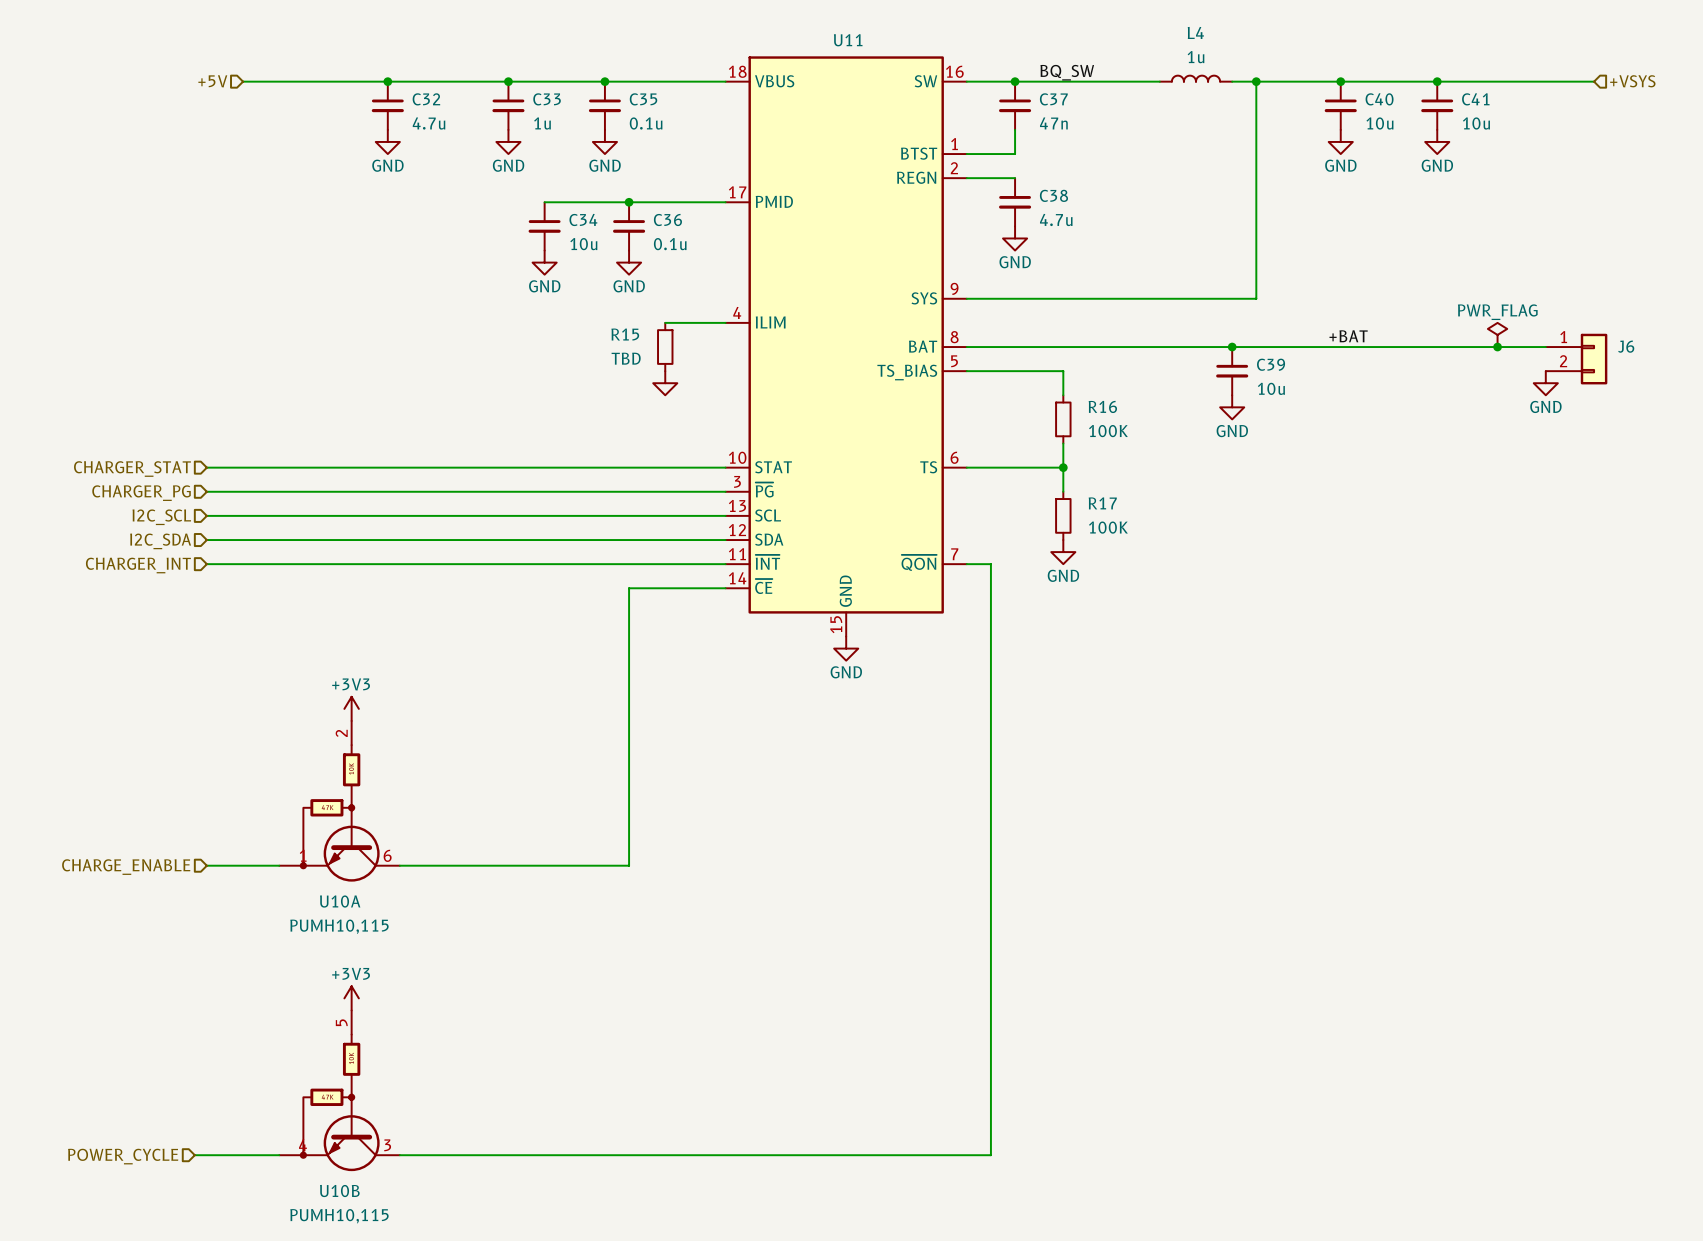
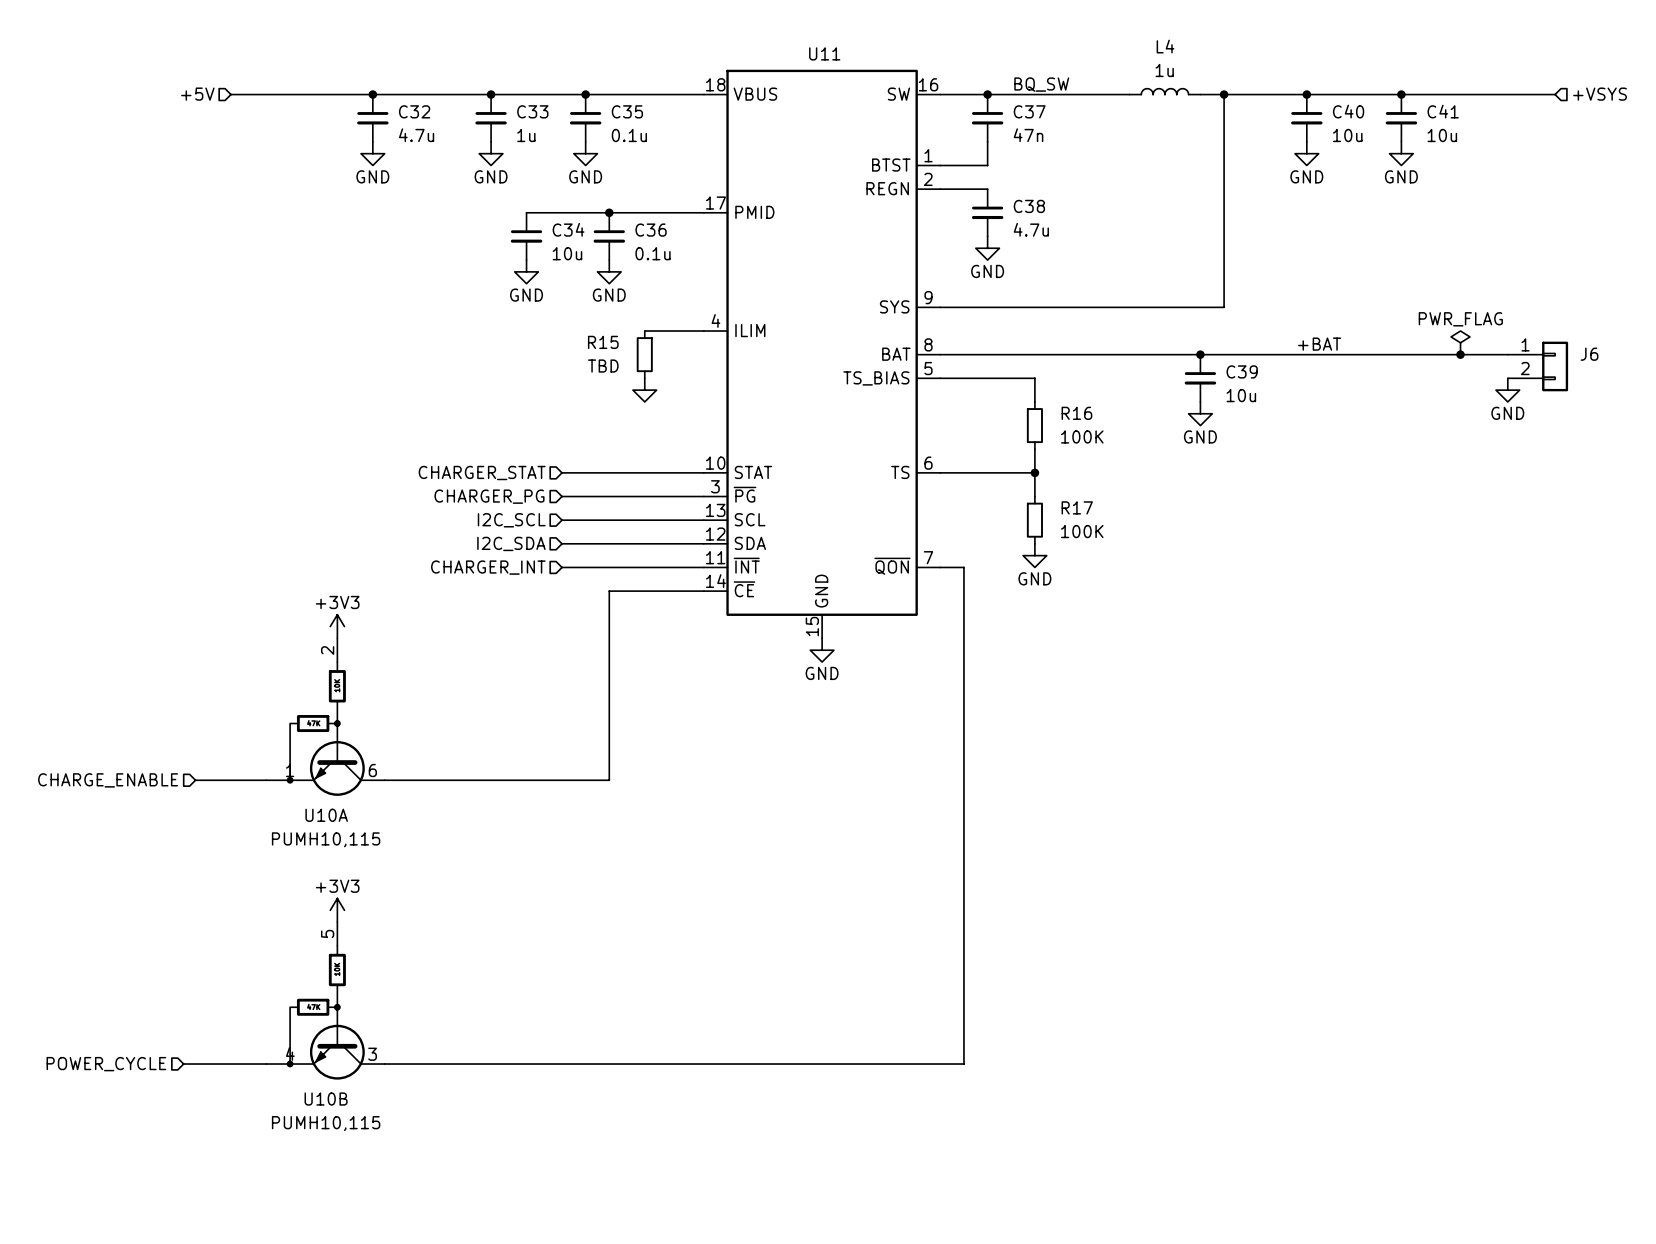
wire: (206, 467) (580, 467) -> none
hierarchical label: CHARGER_STAT (132, 469) -> none
hierarchical label: none -> CHARGER_STAT (482, 473)
wire: (206, 491) (580, 491) -> none
hierarchical label: CHARGER_PG (141, 493) -> none
hierarchical label: none -> CHARGER_PG (489, 496)
wire: (206, 515) (580, 515) -> none
hierarchical label: I2C_SCL (161, 517) -> none
hierarchical label: none -> I2C_SCL (511, 520)
wire: (206, 540) (580, 540) -> none
hierarchical label: I2C_SDA (160, 541) -> none
hierarchical label: none -> I2C_SDA (511, 543)
wire: (206, 564) (580, 564) -> none
hierarchical label: CHARGER_INT (138, 565) -> none
hierarchical label: none -> CHARGER_INT (488, 567)
power symbol position: +3V3 (351, 708) -> +3V3 (337, 626)
wire: (629, 781) (629, 865) (399, 865) -> (609, 780) (384, 780)
U10A position: (339, 801) -> (325, 717)
wire: (206, 865) (279, 865) -> (195, 780) (266, 780)
hierarchical label position: CHARGE_ENABLE (126, 867) -> CHARGE_ENABLE (108, 780)
power symbol position: +3V3 (351, 998) -> +3V3 (337, 910)
wire: (990, 1070) (990, 1155) (399, 1155) -> (963, 1064) (384, 1064)
U10B position: (339, 1090) -> (325, 1000)
wire: (194, 1155) (279, 1155) -> (183, 1064) (266, 1064)
hierarchical label position: POWER_CYCLE (123, 1156) -> POWER_CYCLE (106, 1064)

